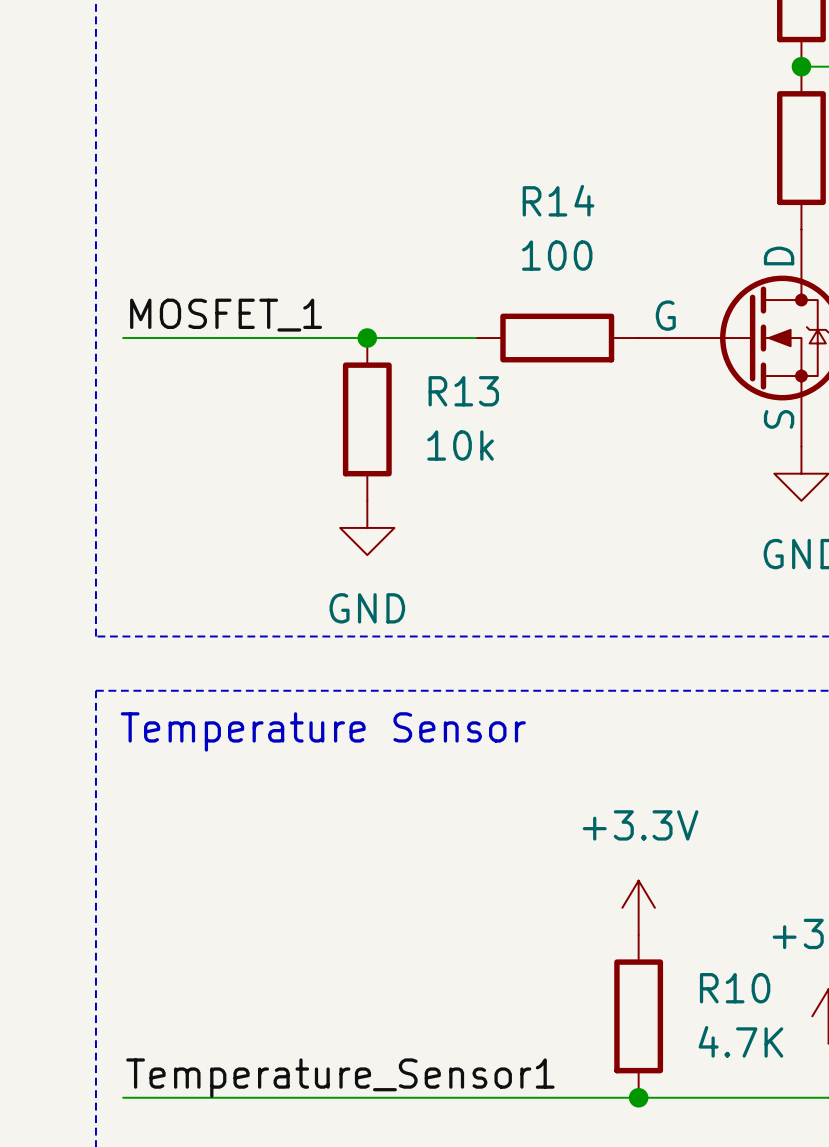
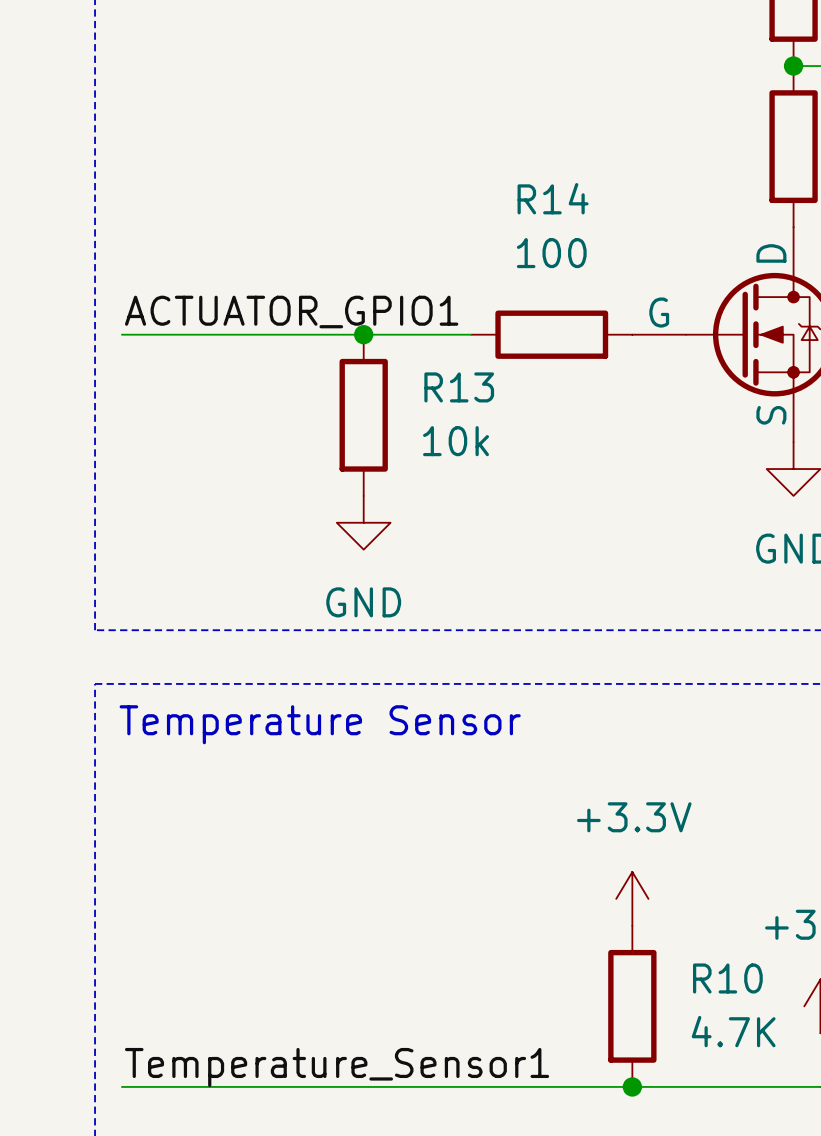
label: MOSFET_1 (226, 315) -> ACTUATOR_GPIO1 (291, 312)

